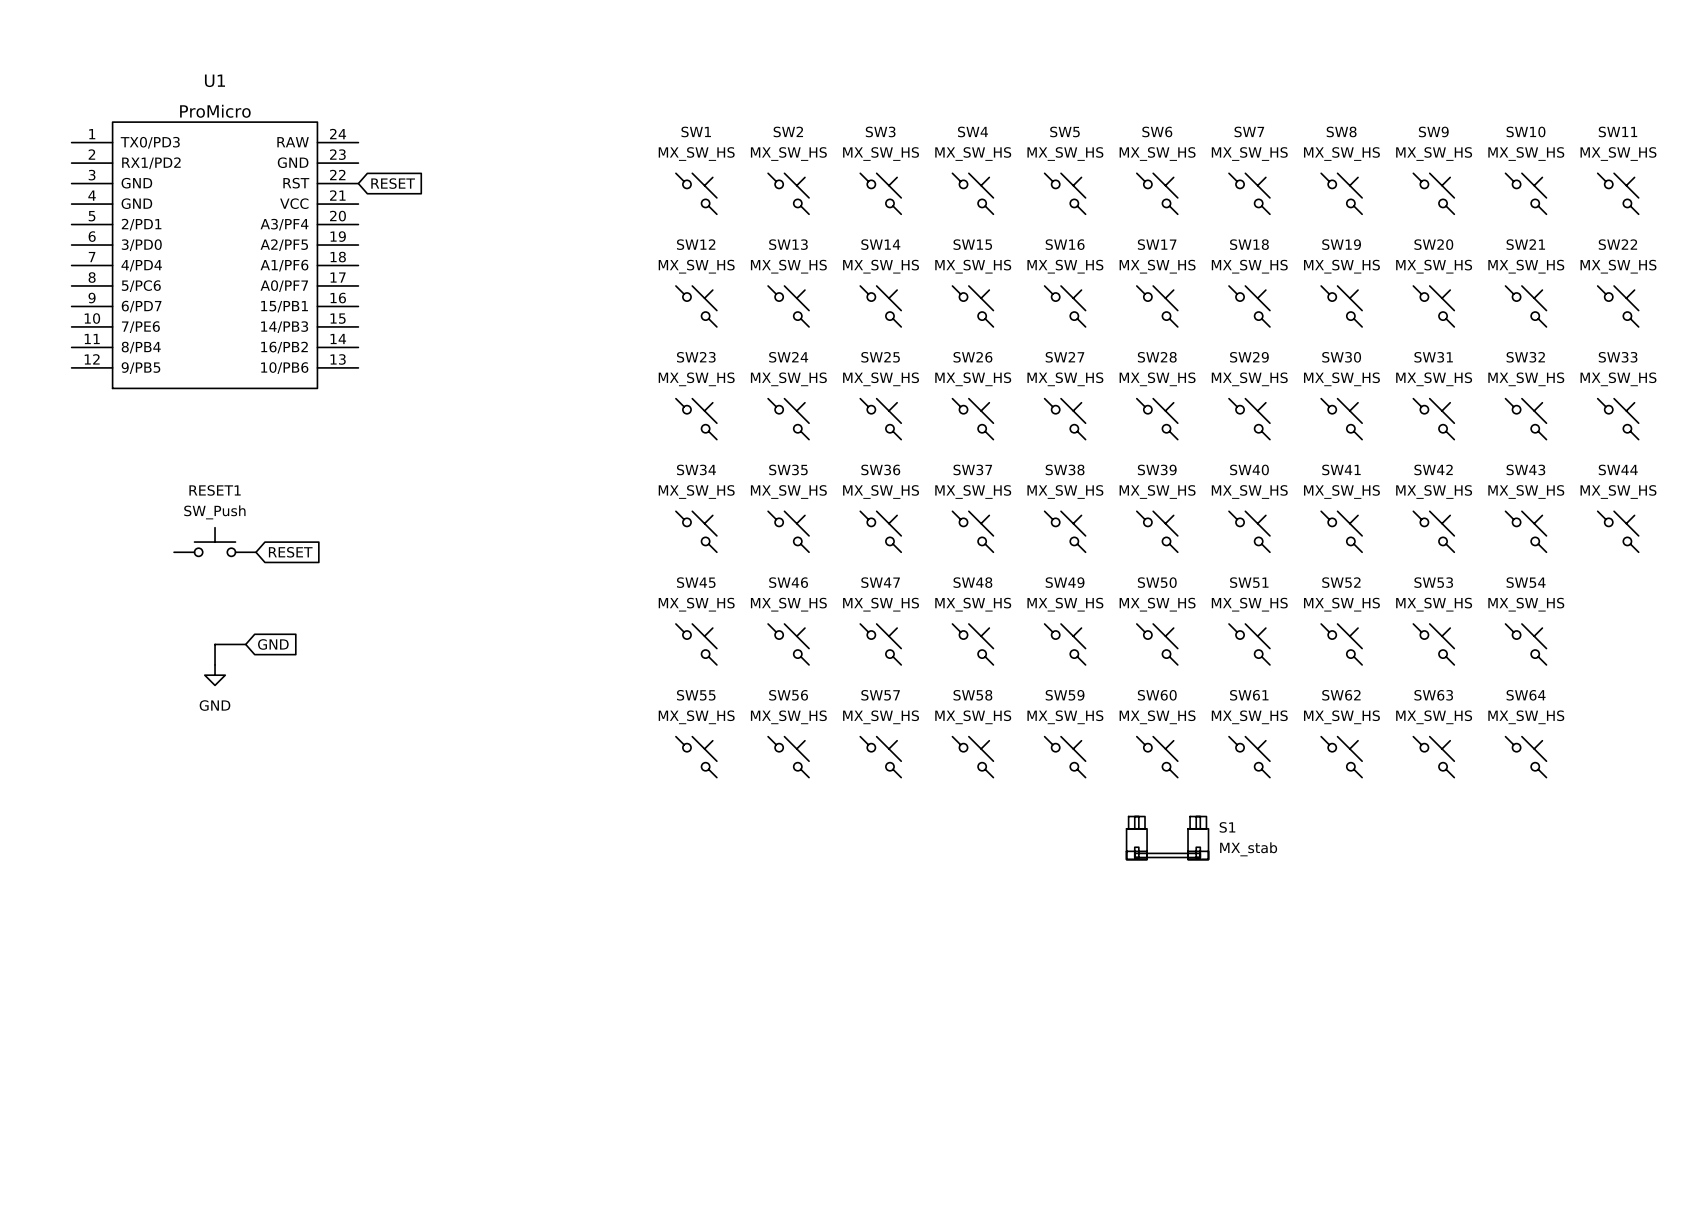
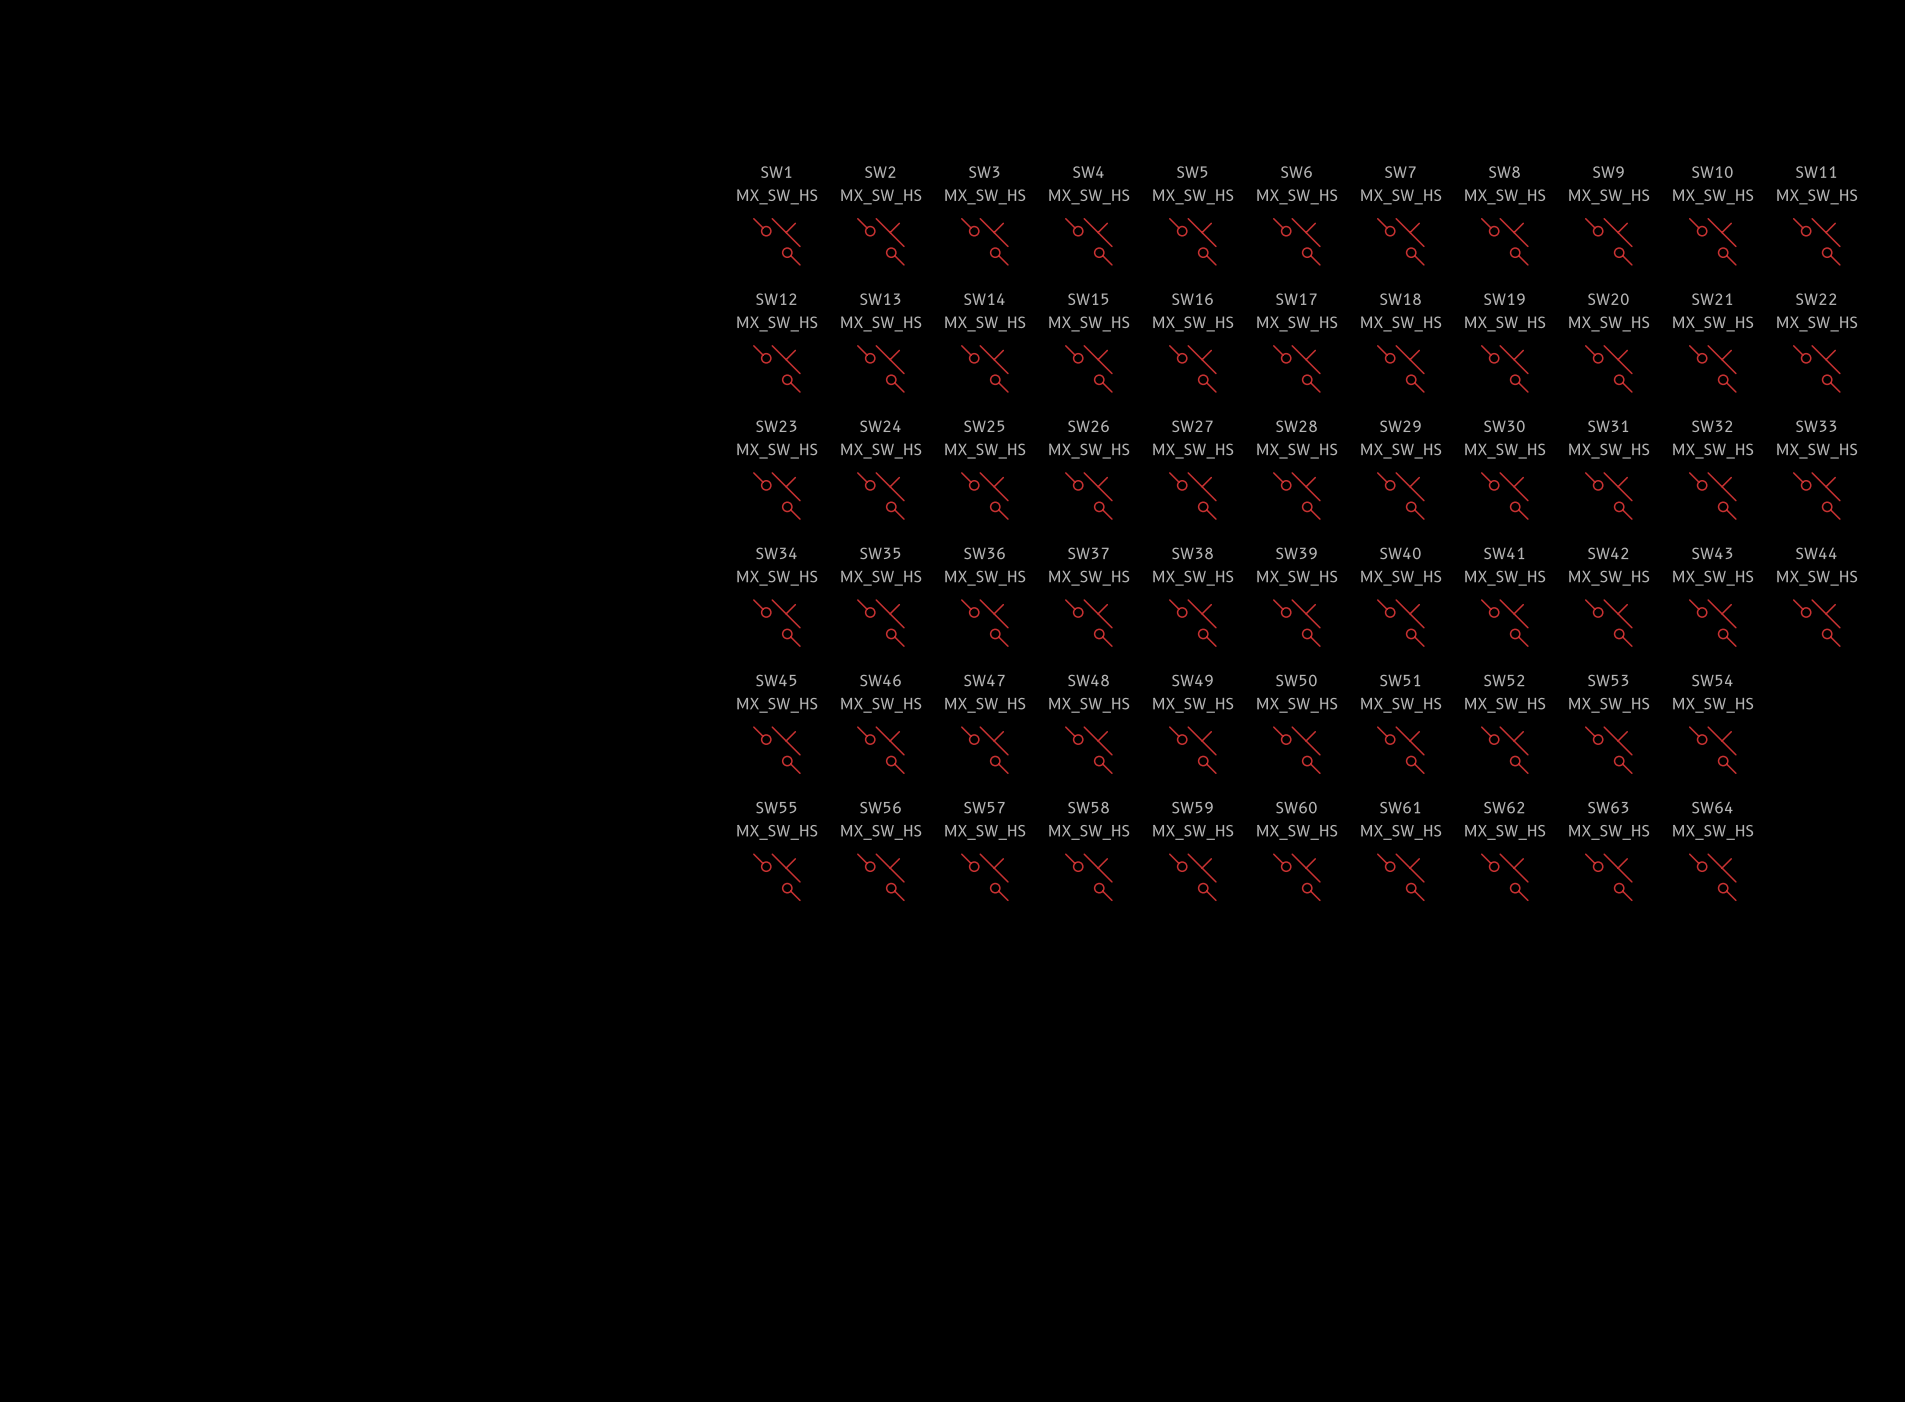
global label: RESET (393, 183) -> none
U1: ProMicro (215, 255) -> none
RESET1: SW_Push (215, 542) -> none
global label: RESET (290, 552) -> none
wire: (245, 644) (215, 644) (215, 664) -> none
global label: GND (273, 644) -> none
power symbol: GND (215, 675) -> none
S1: MX_stab (1167, 838) -> none

